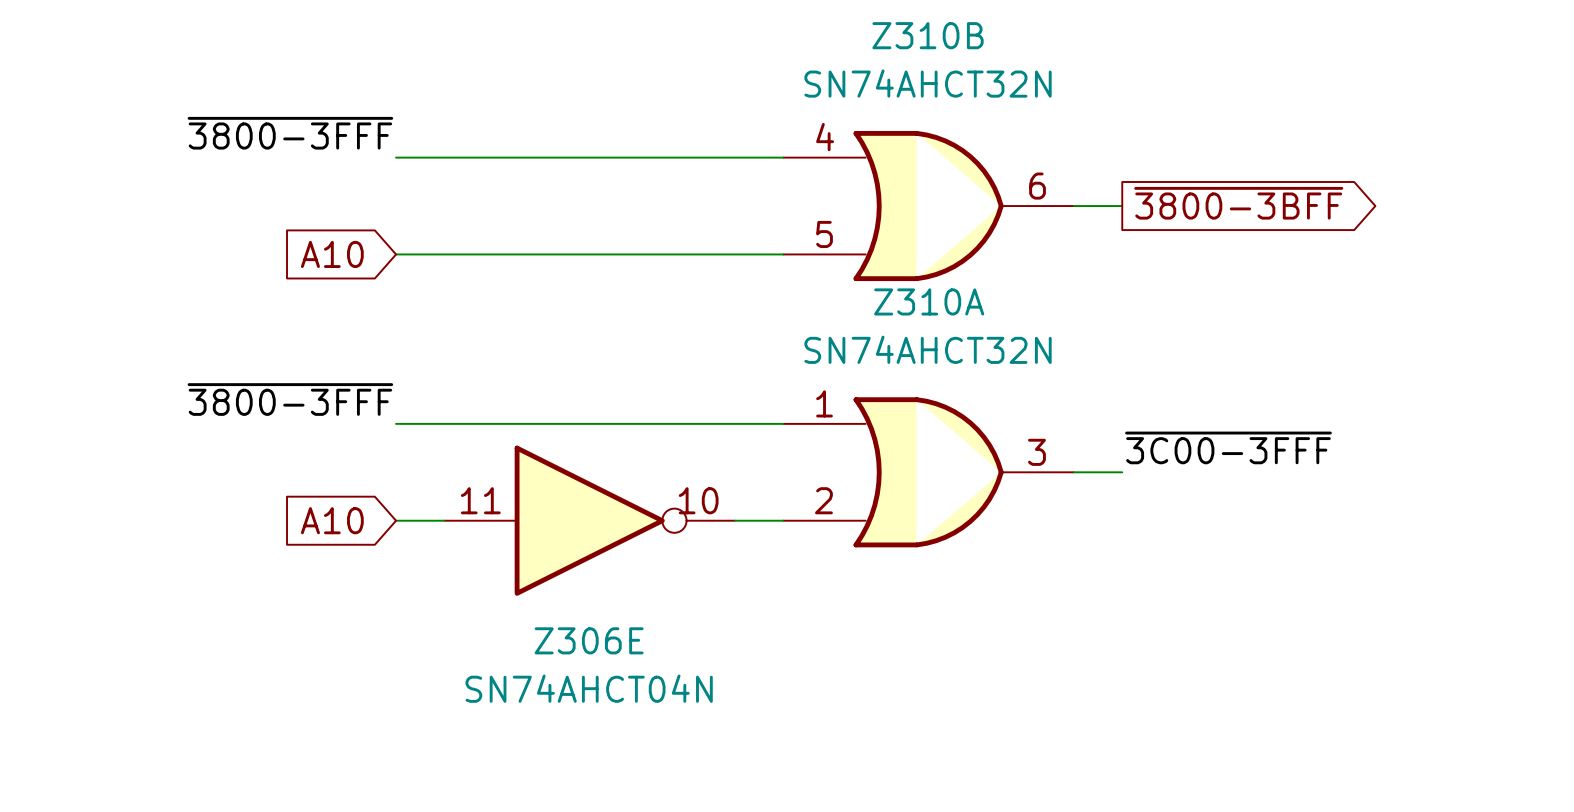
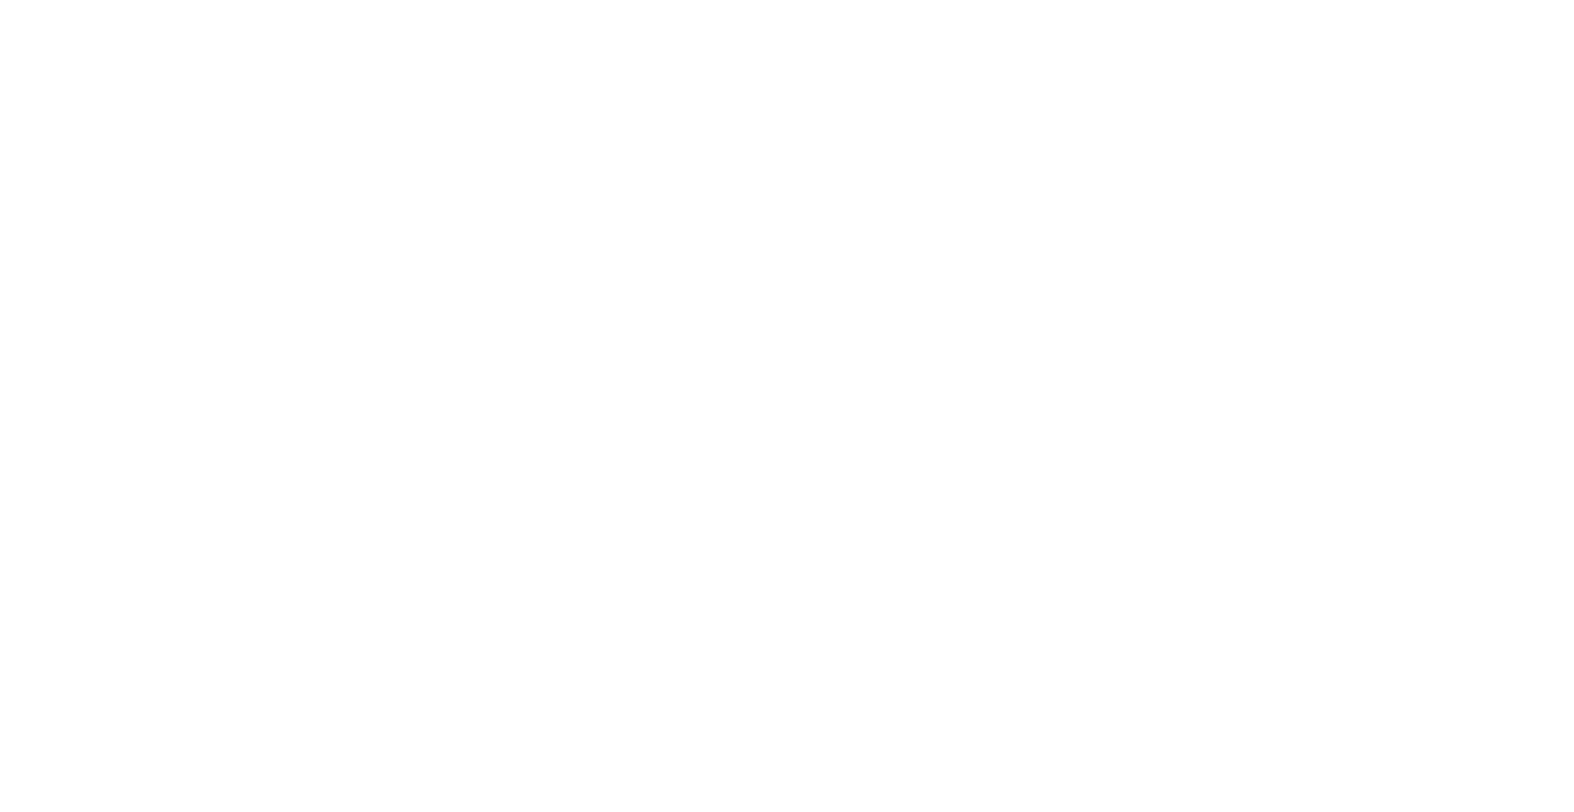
label: ~{3800-3FFF} (290, 133) -> none
wire: (396, 157) (783, 157) -> none
global label: ~{3800-3BFF} (1238, 203) -> none
Z310B: SN74AHCT32N (928, 206) -> none
wire: (1073, 206) (1122, 206) -> none
global label: A10 (332, 254) -> none
wire: (396, 254) (783, 254) -> none
label: ~{3800-3FFF} (290, 399) -> none
wire: (396, 423) (783, 423) -> none
label: ~{3C00-3FFF} (1228, 447) -> none
Z310A: SN74AHCT32N (928, 472) -> none
wire: (1073, 472) (1122, 472) -> none
global label: A10 (332, 520) -> none
wire: (396, 520) (444, 520) -> none
Z306E: SN74AHCT04N (589, 520) -> none
wire: (734, 520) (783, 520) -> none

